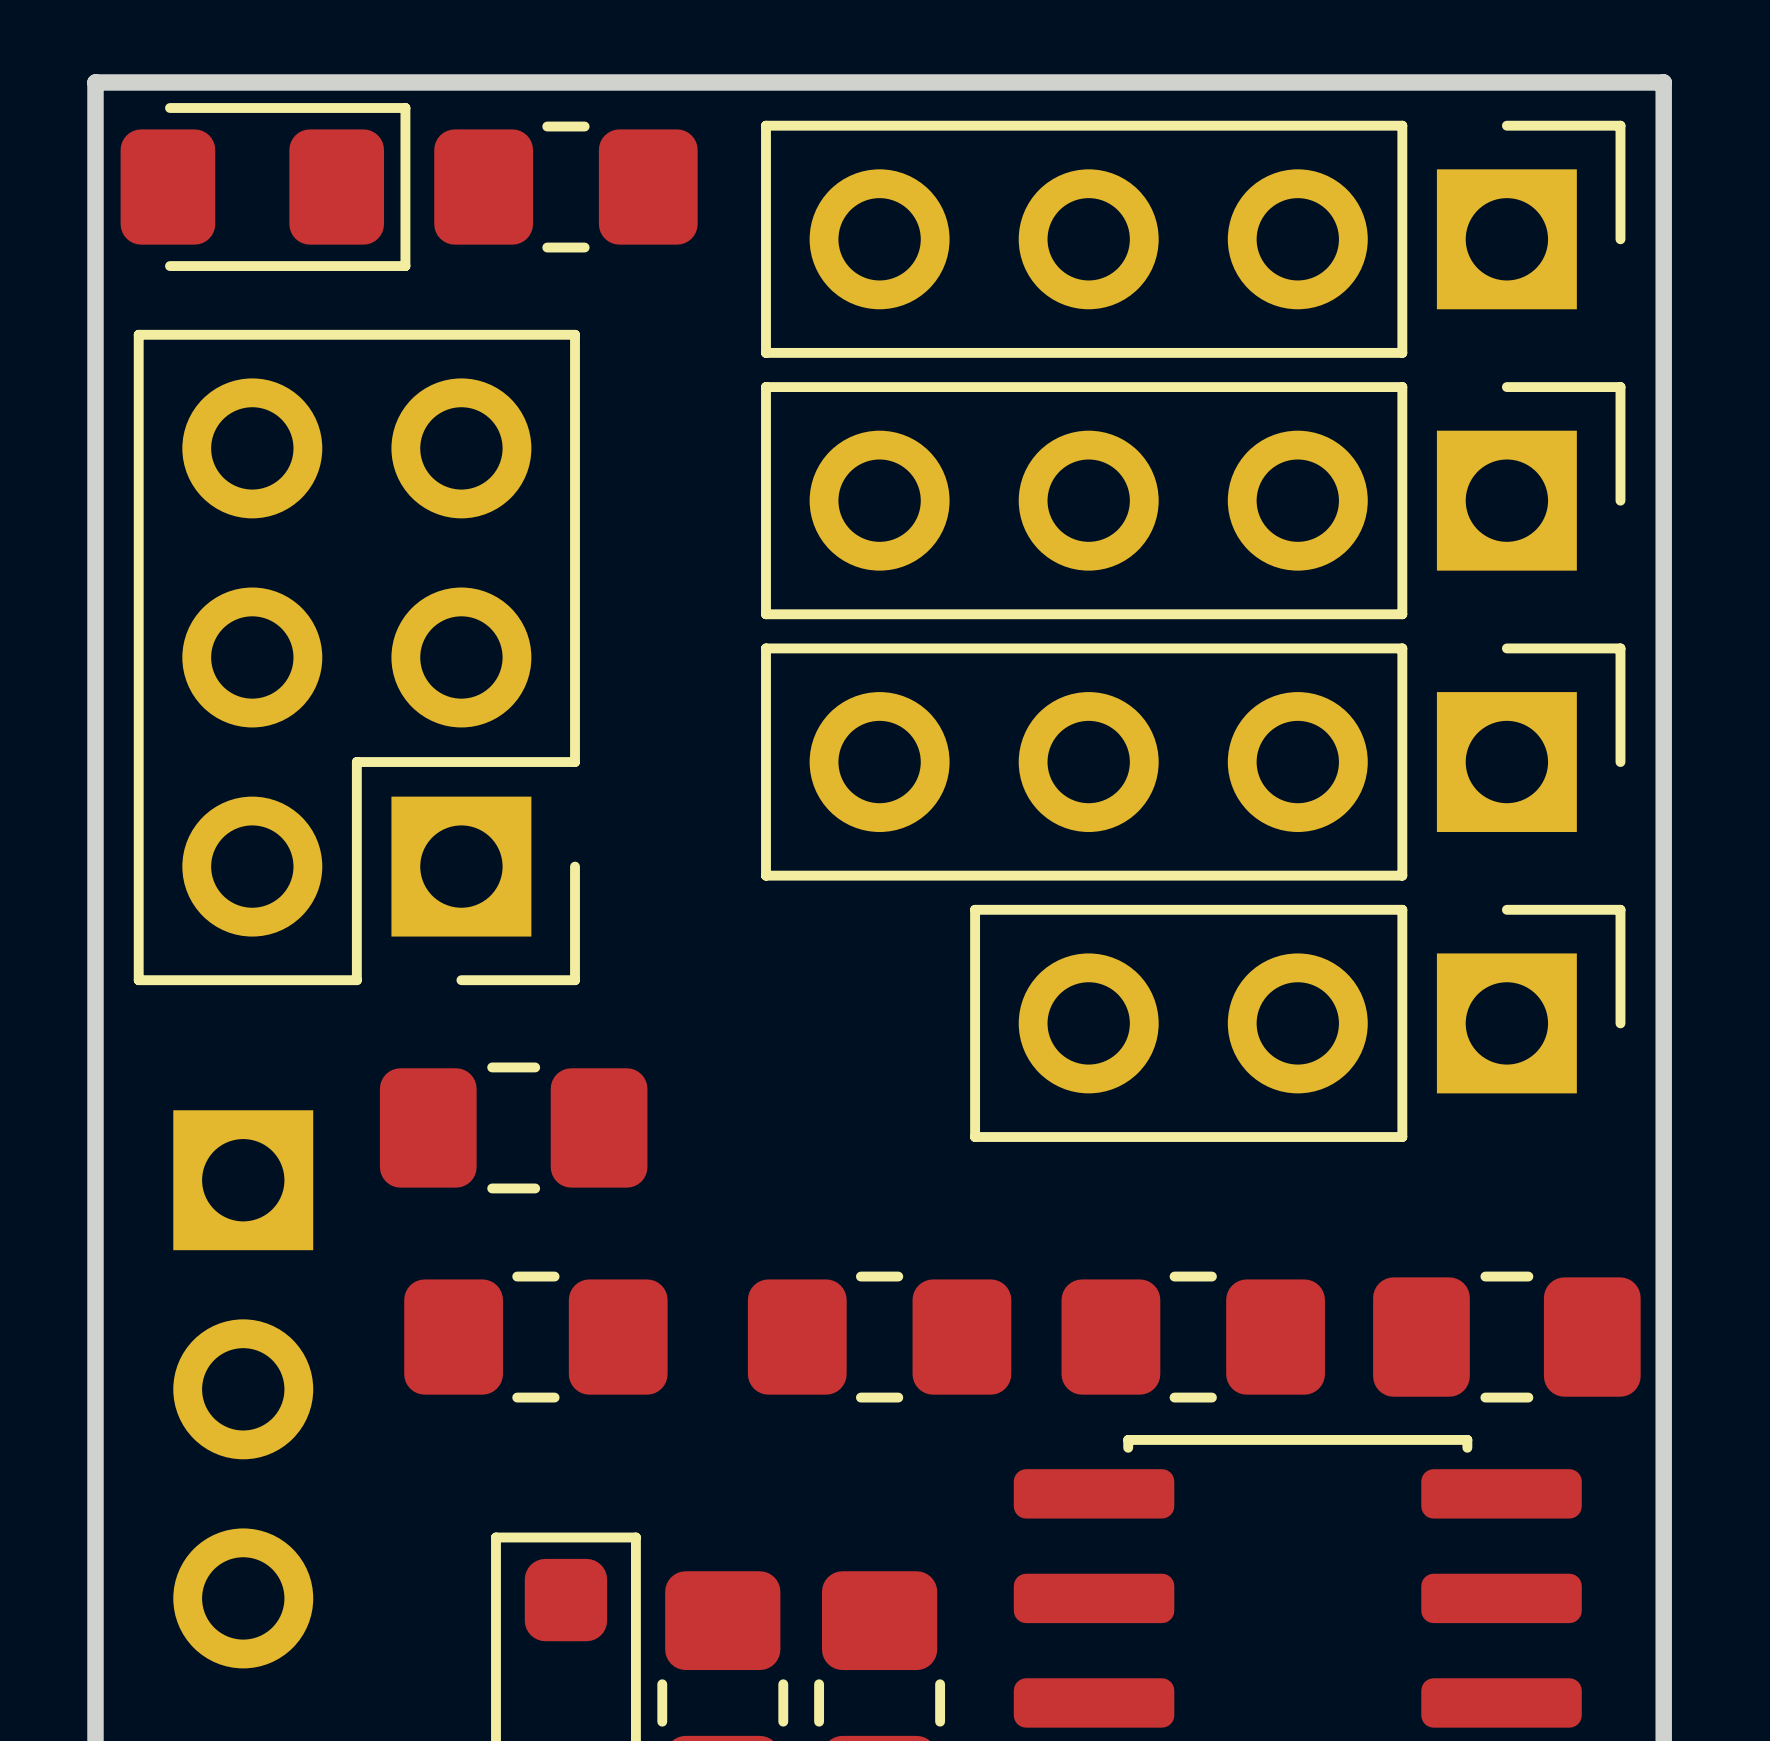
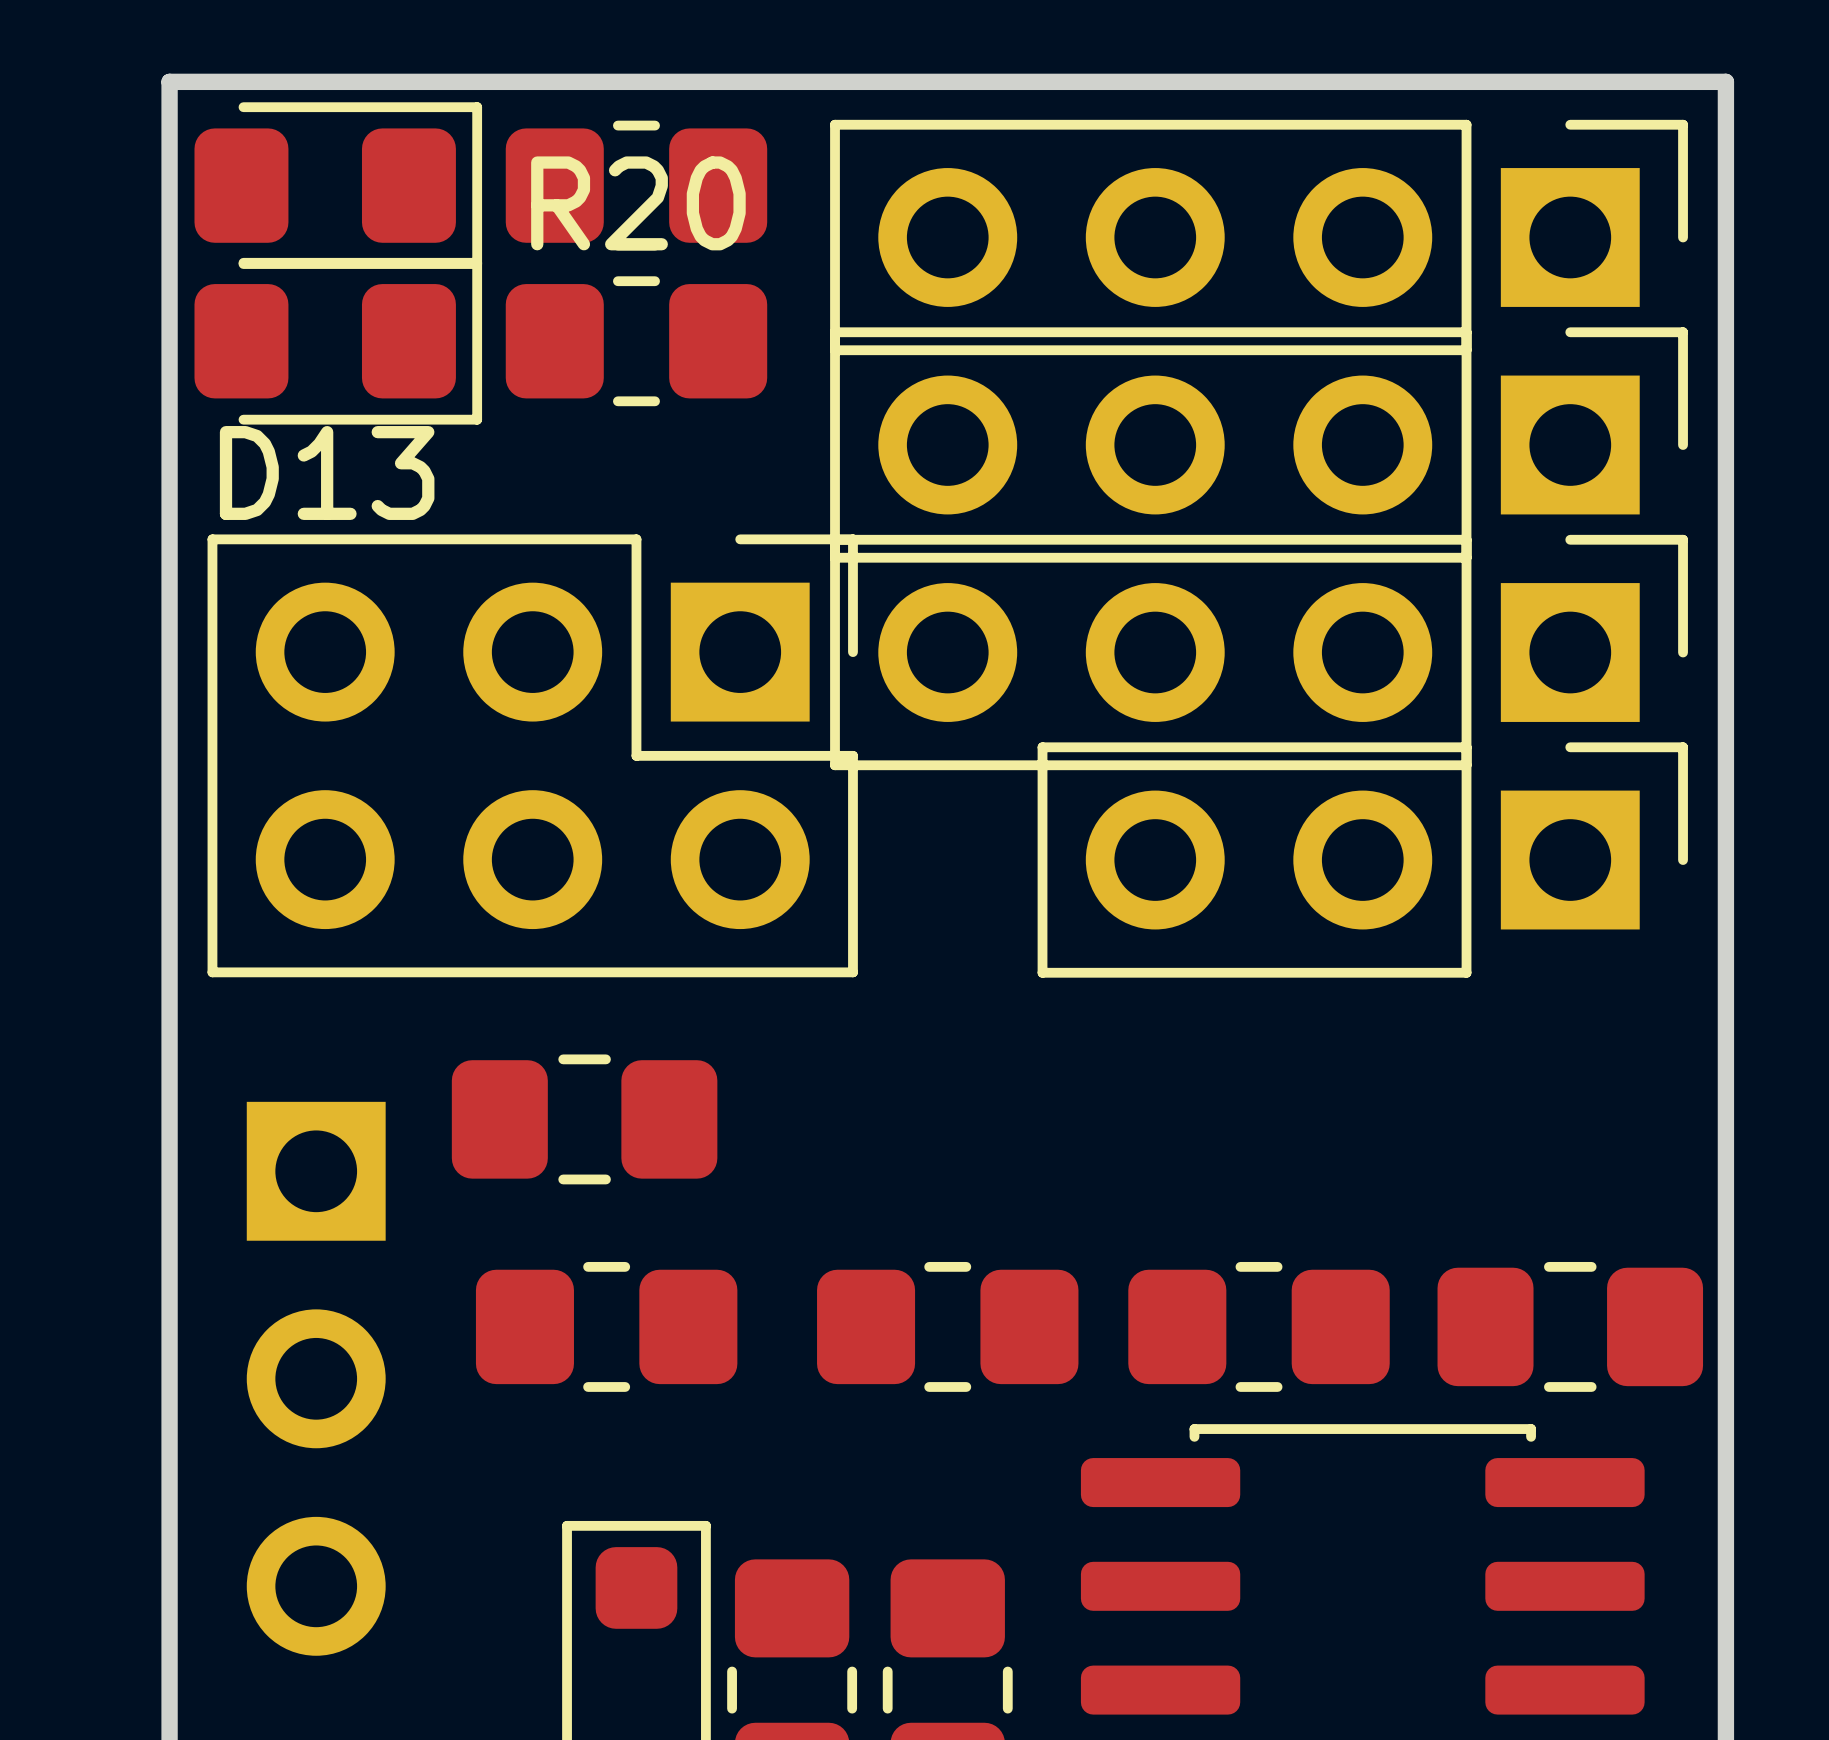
D13: none -> (338, 341)
R20: none -> (636, 341)
part position: (1193, 500) -> (1259, 445)
part rotation: 0° (356, 657) -> 90° counterclockwise (532, 755)
part position: (1193, 762) -> (1259, 652)
part position: (1297, 1023) -> (1362, 860)

